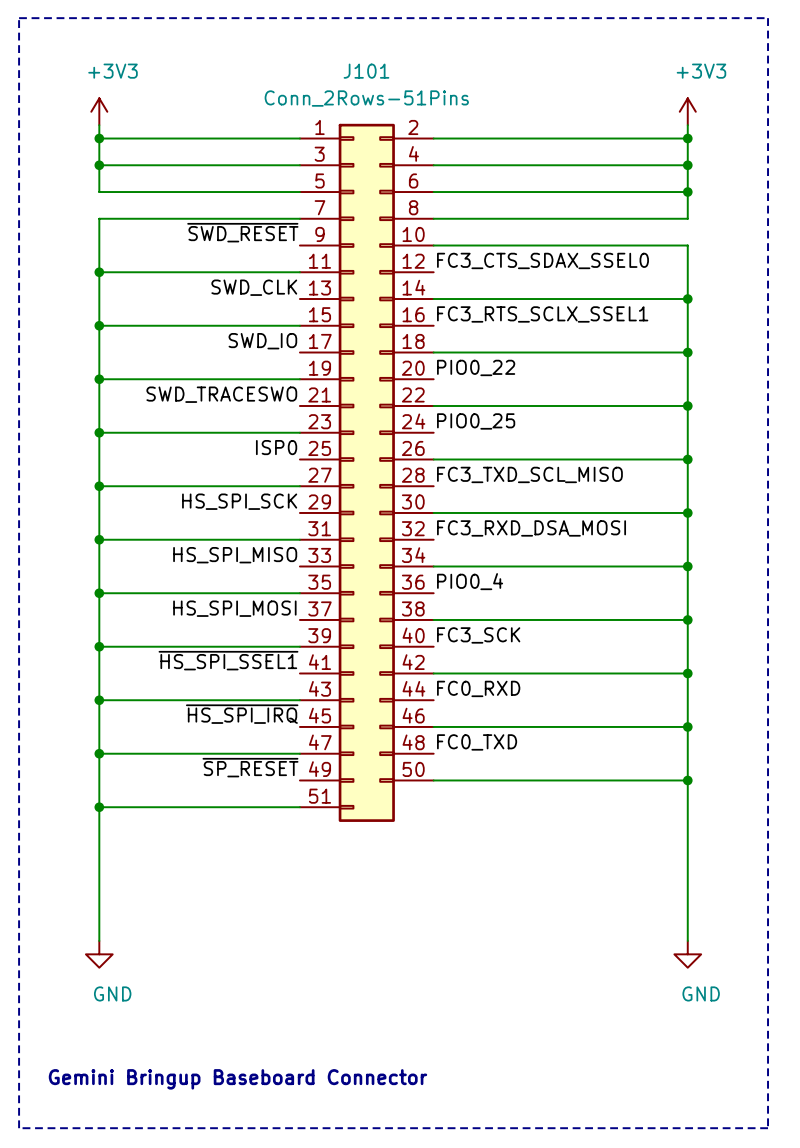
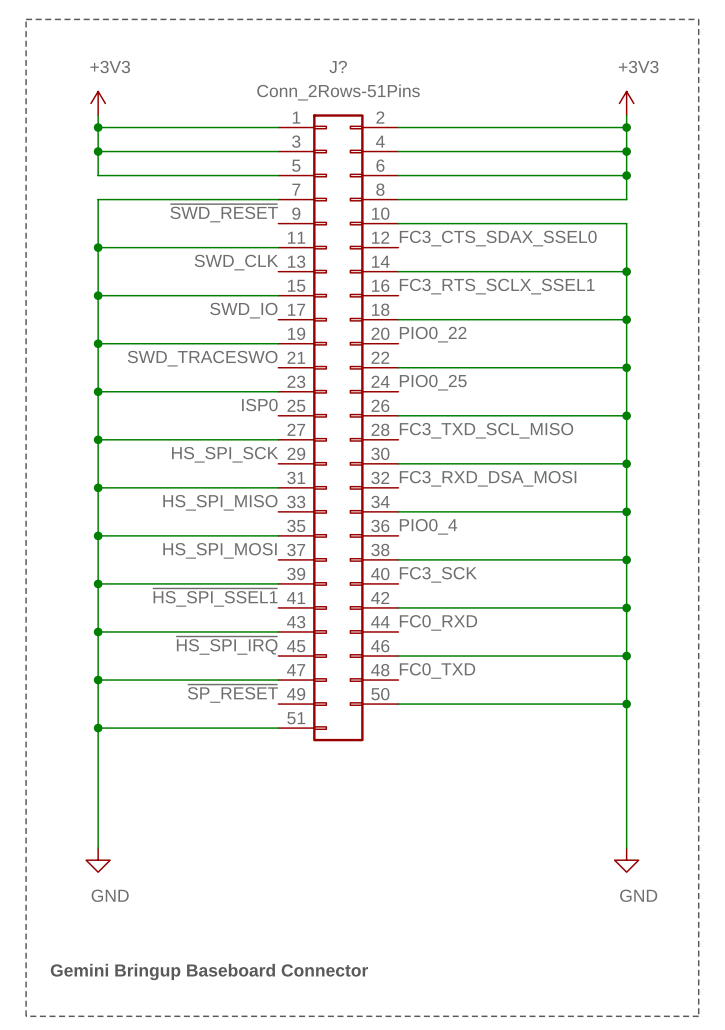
J101 name: J101 (366, 71) -> J? (338, 67)

